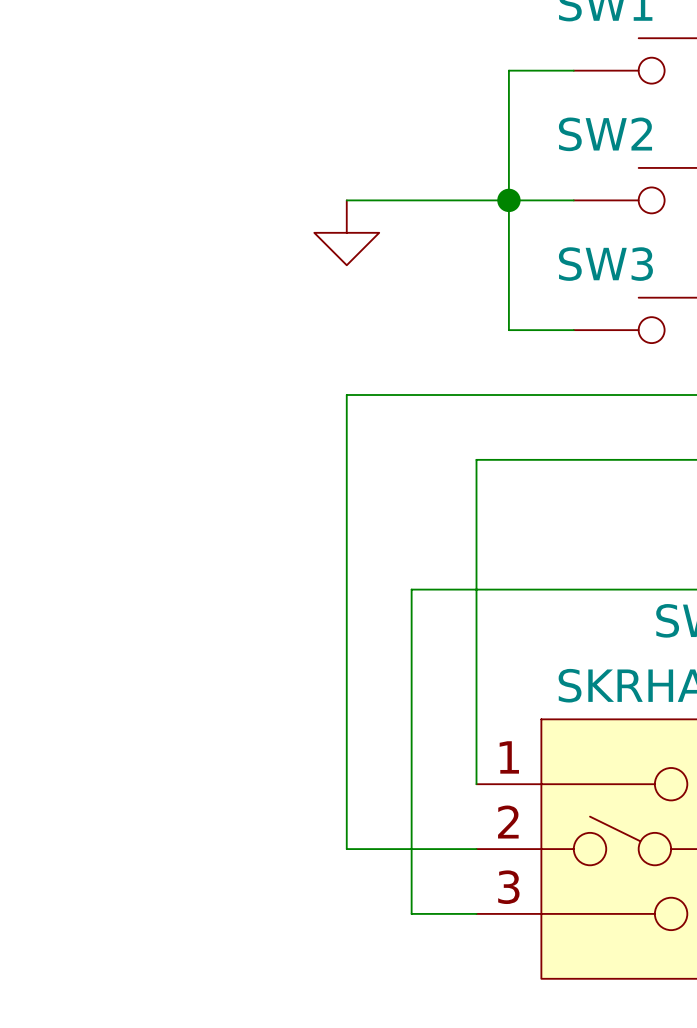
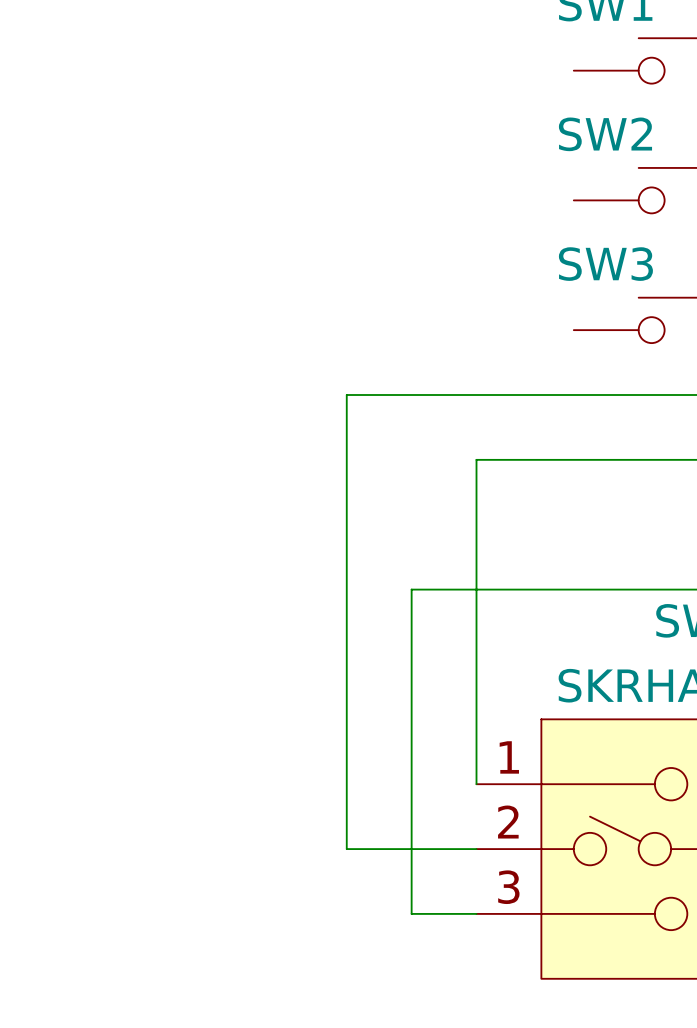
wire: (573, 70) (508, 70) (508, 330) (573, 330) -> none
wire: (346, 200) (573, 200) -> none
junction: (508, 200) -> none
power symbol: (346, 232) -> none

